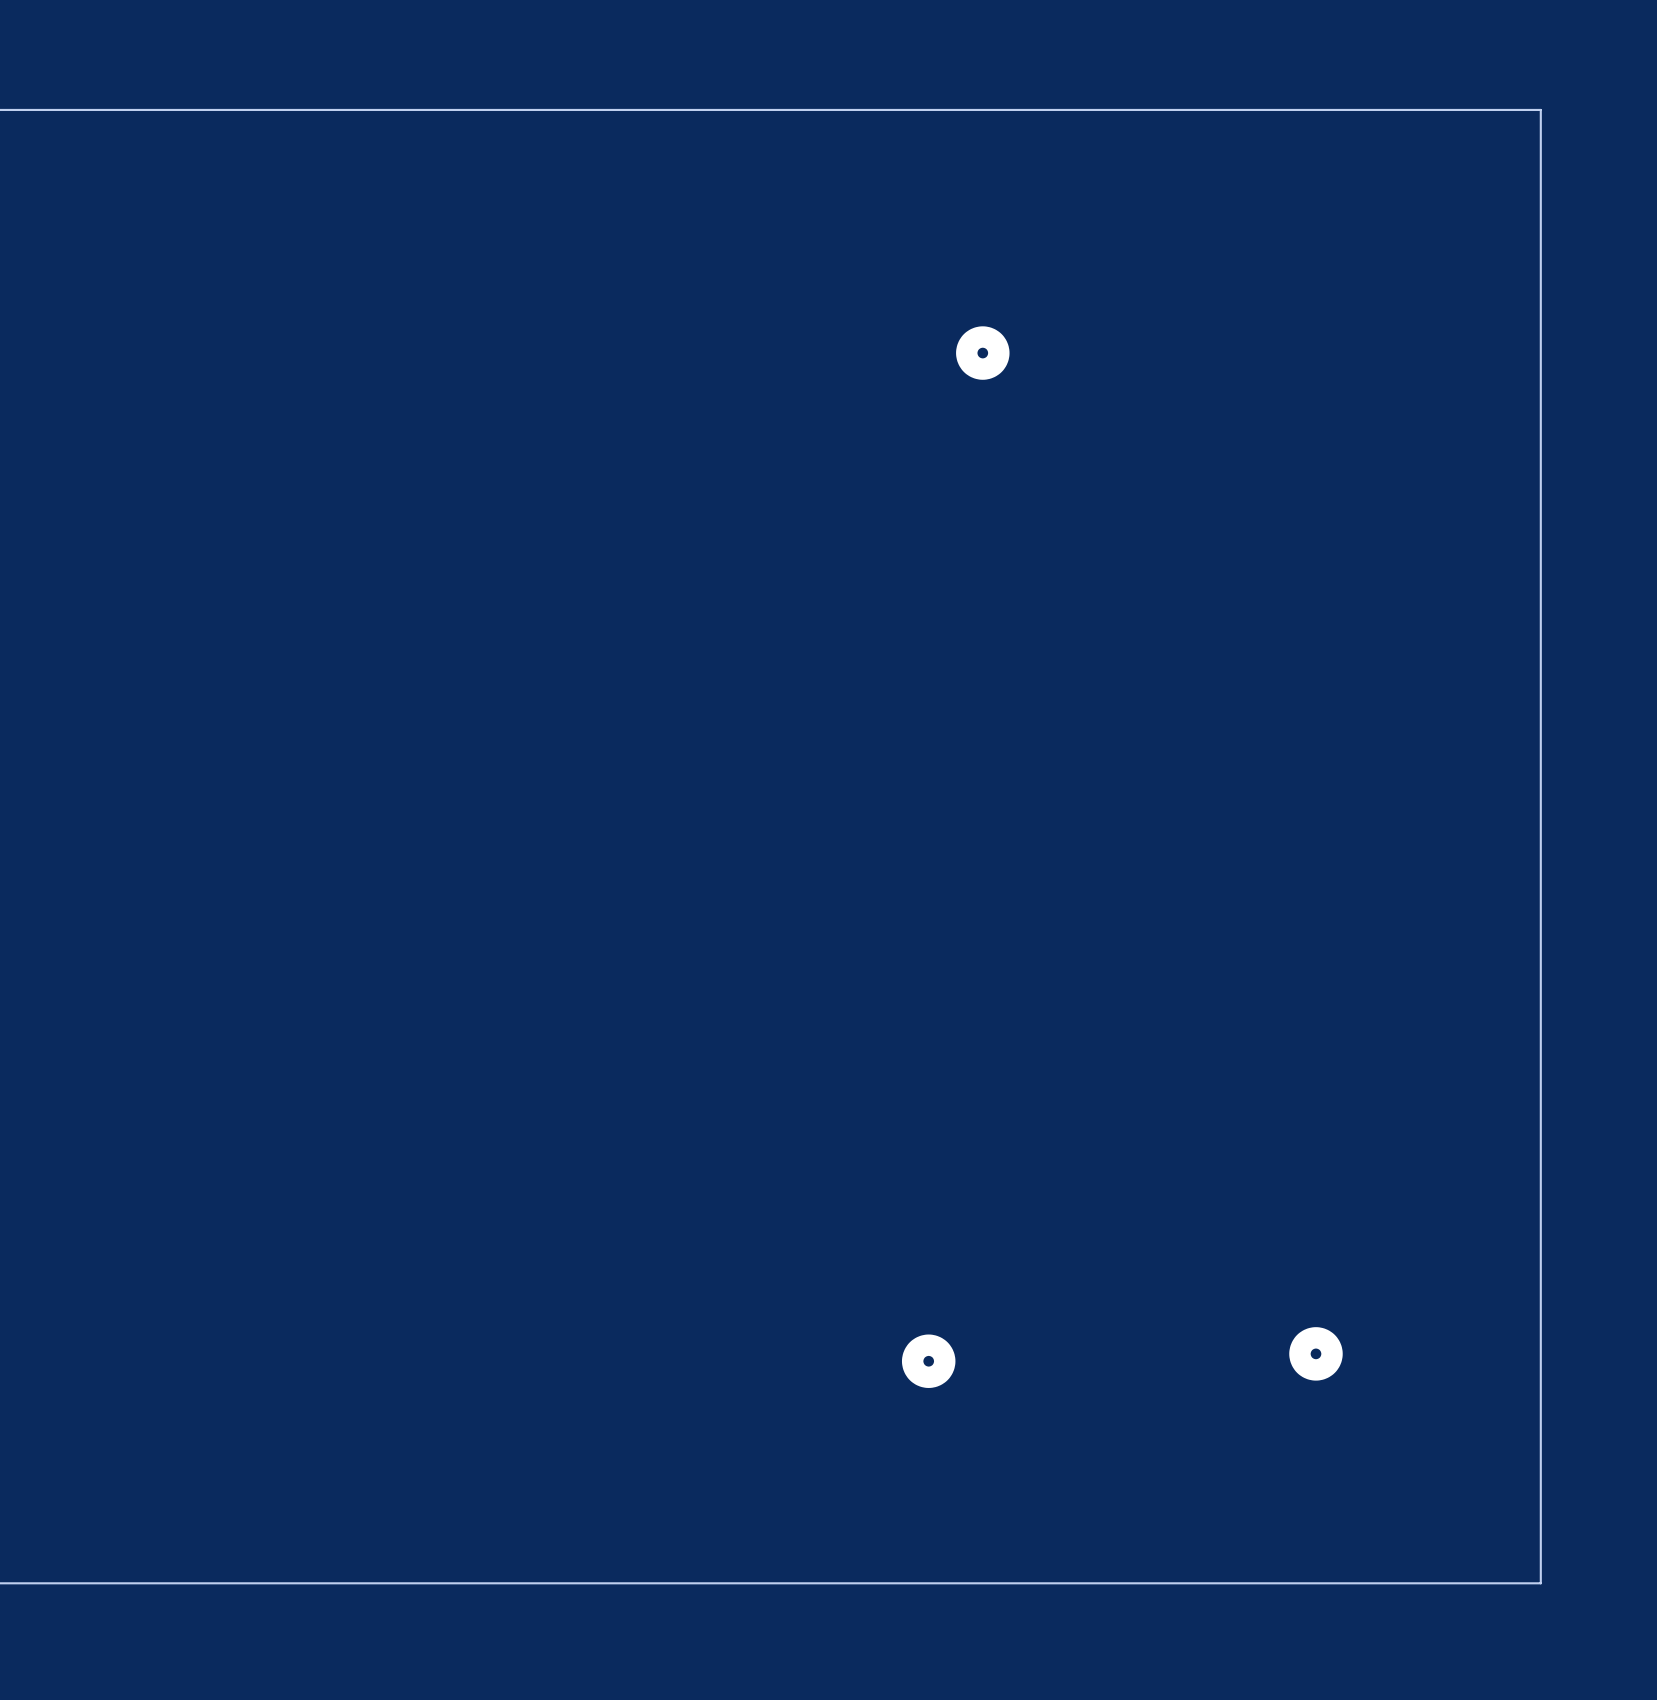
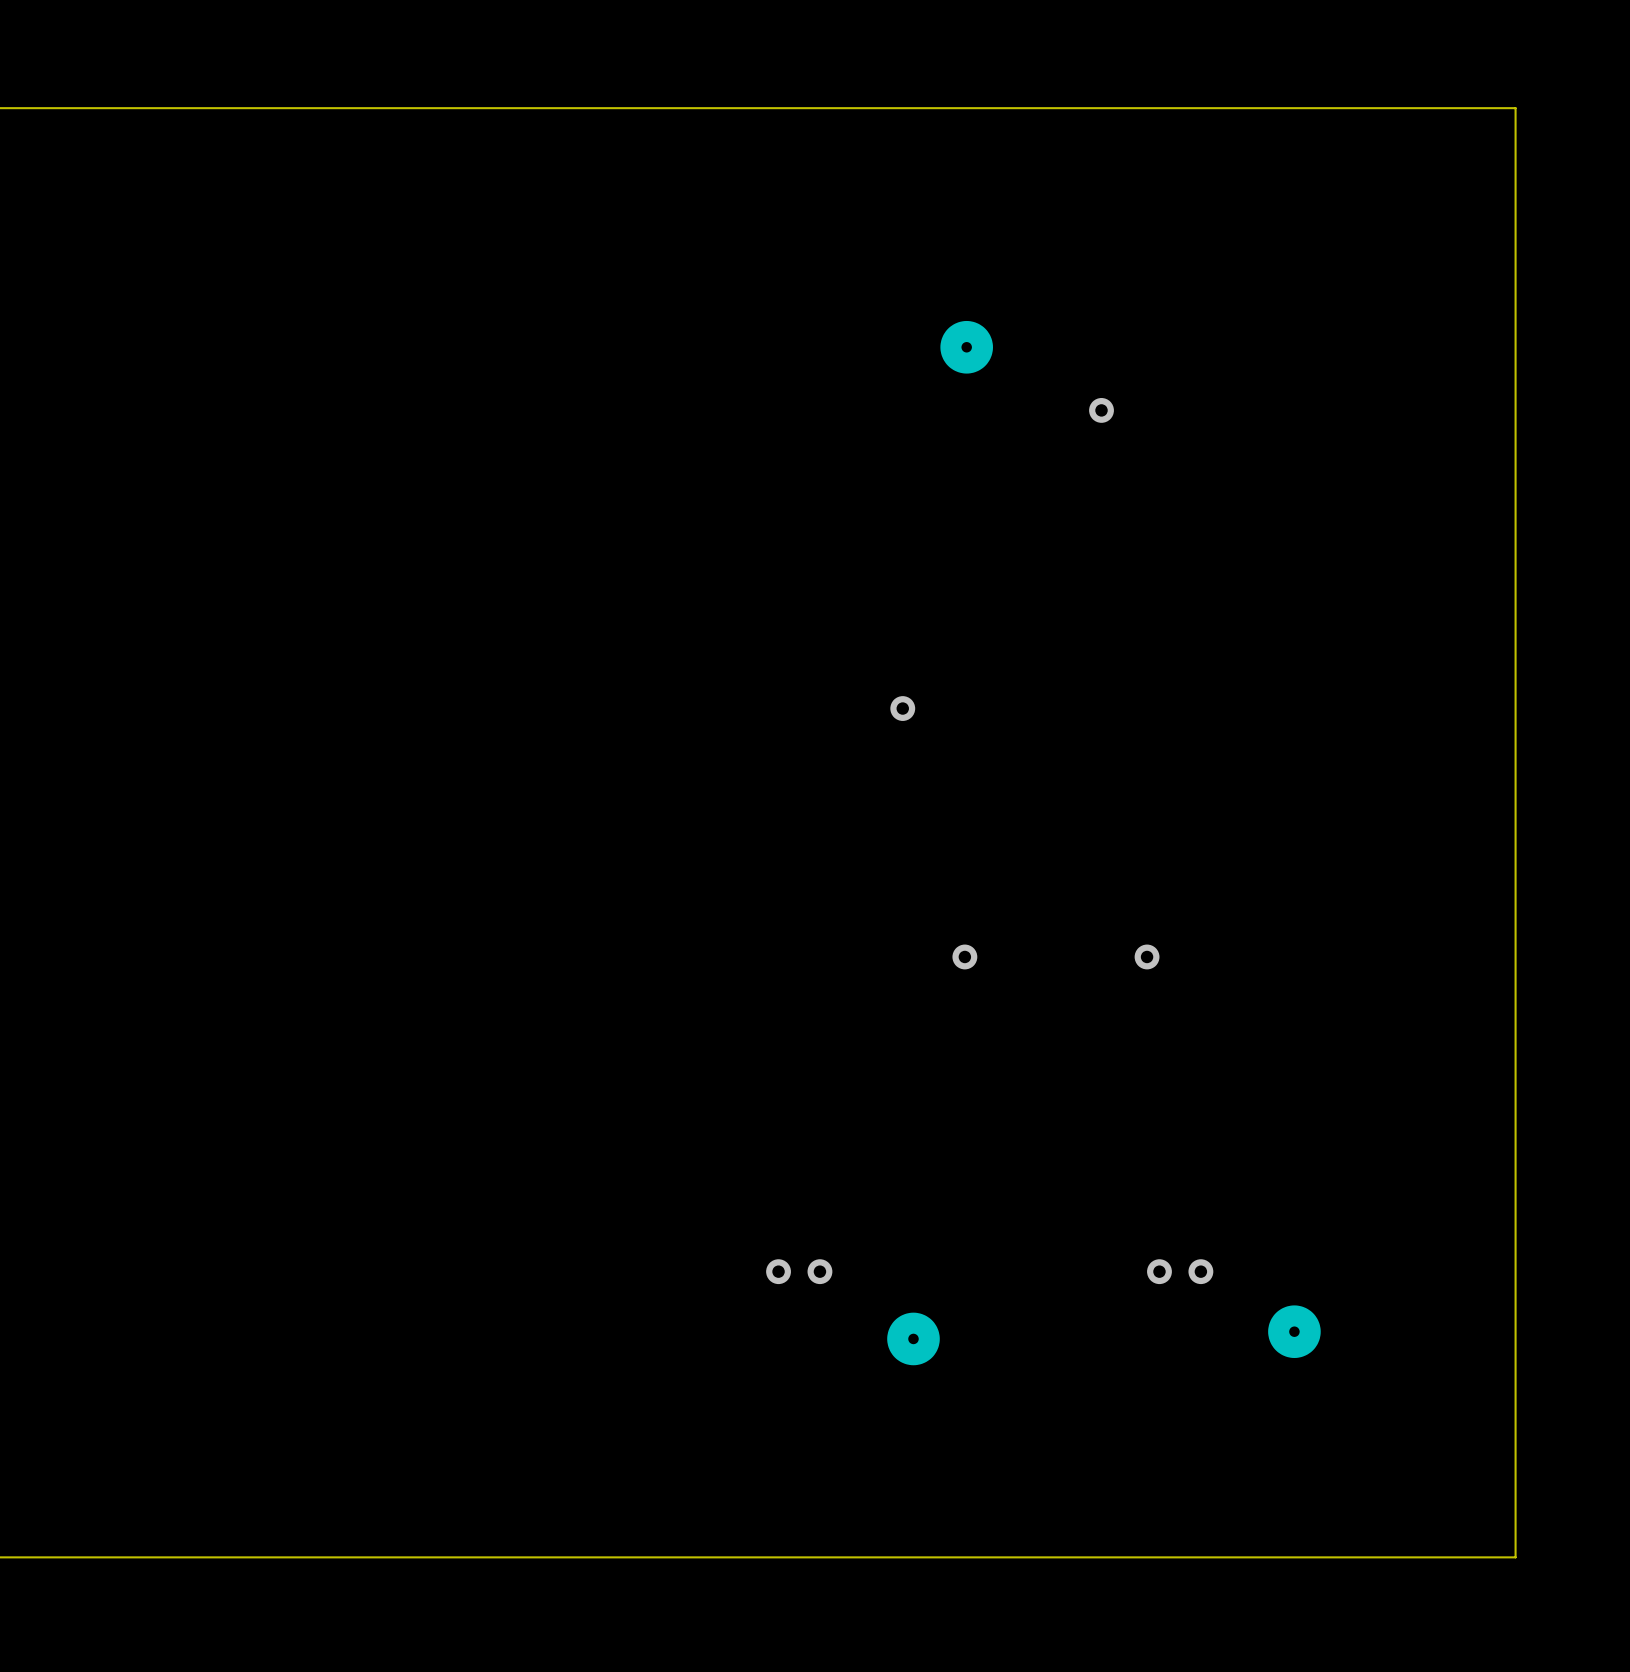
via: none -> (1101, 410)
via: none -> (902, 708)
via: none -> (964, 956)
via: none -> (1147, 956)
via: none -> (778, 1271)
via: none -> (819, 1271)
via: none -> (1159, 1271)
via: none -> (1200, 1271)

